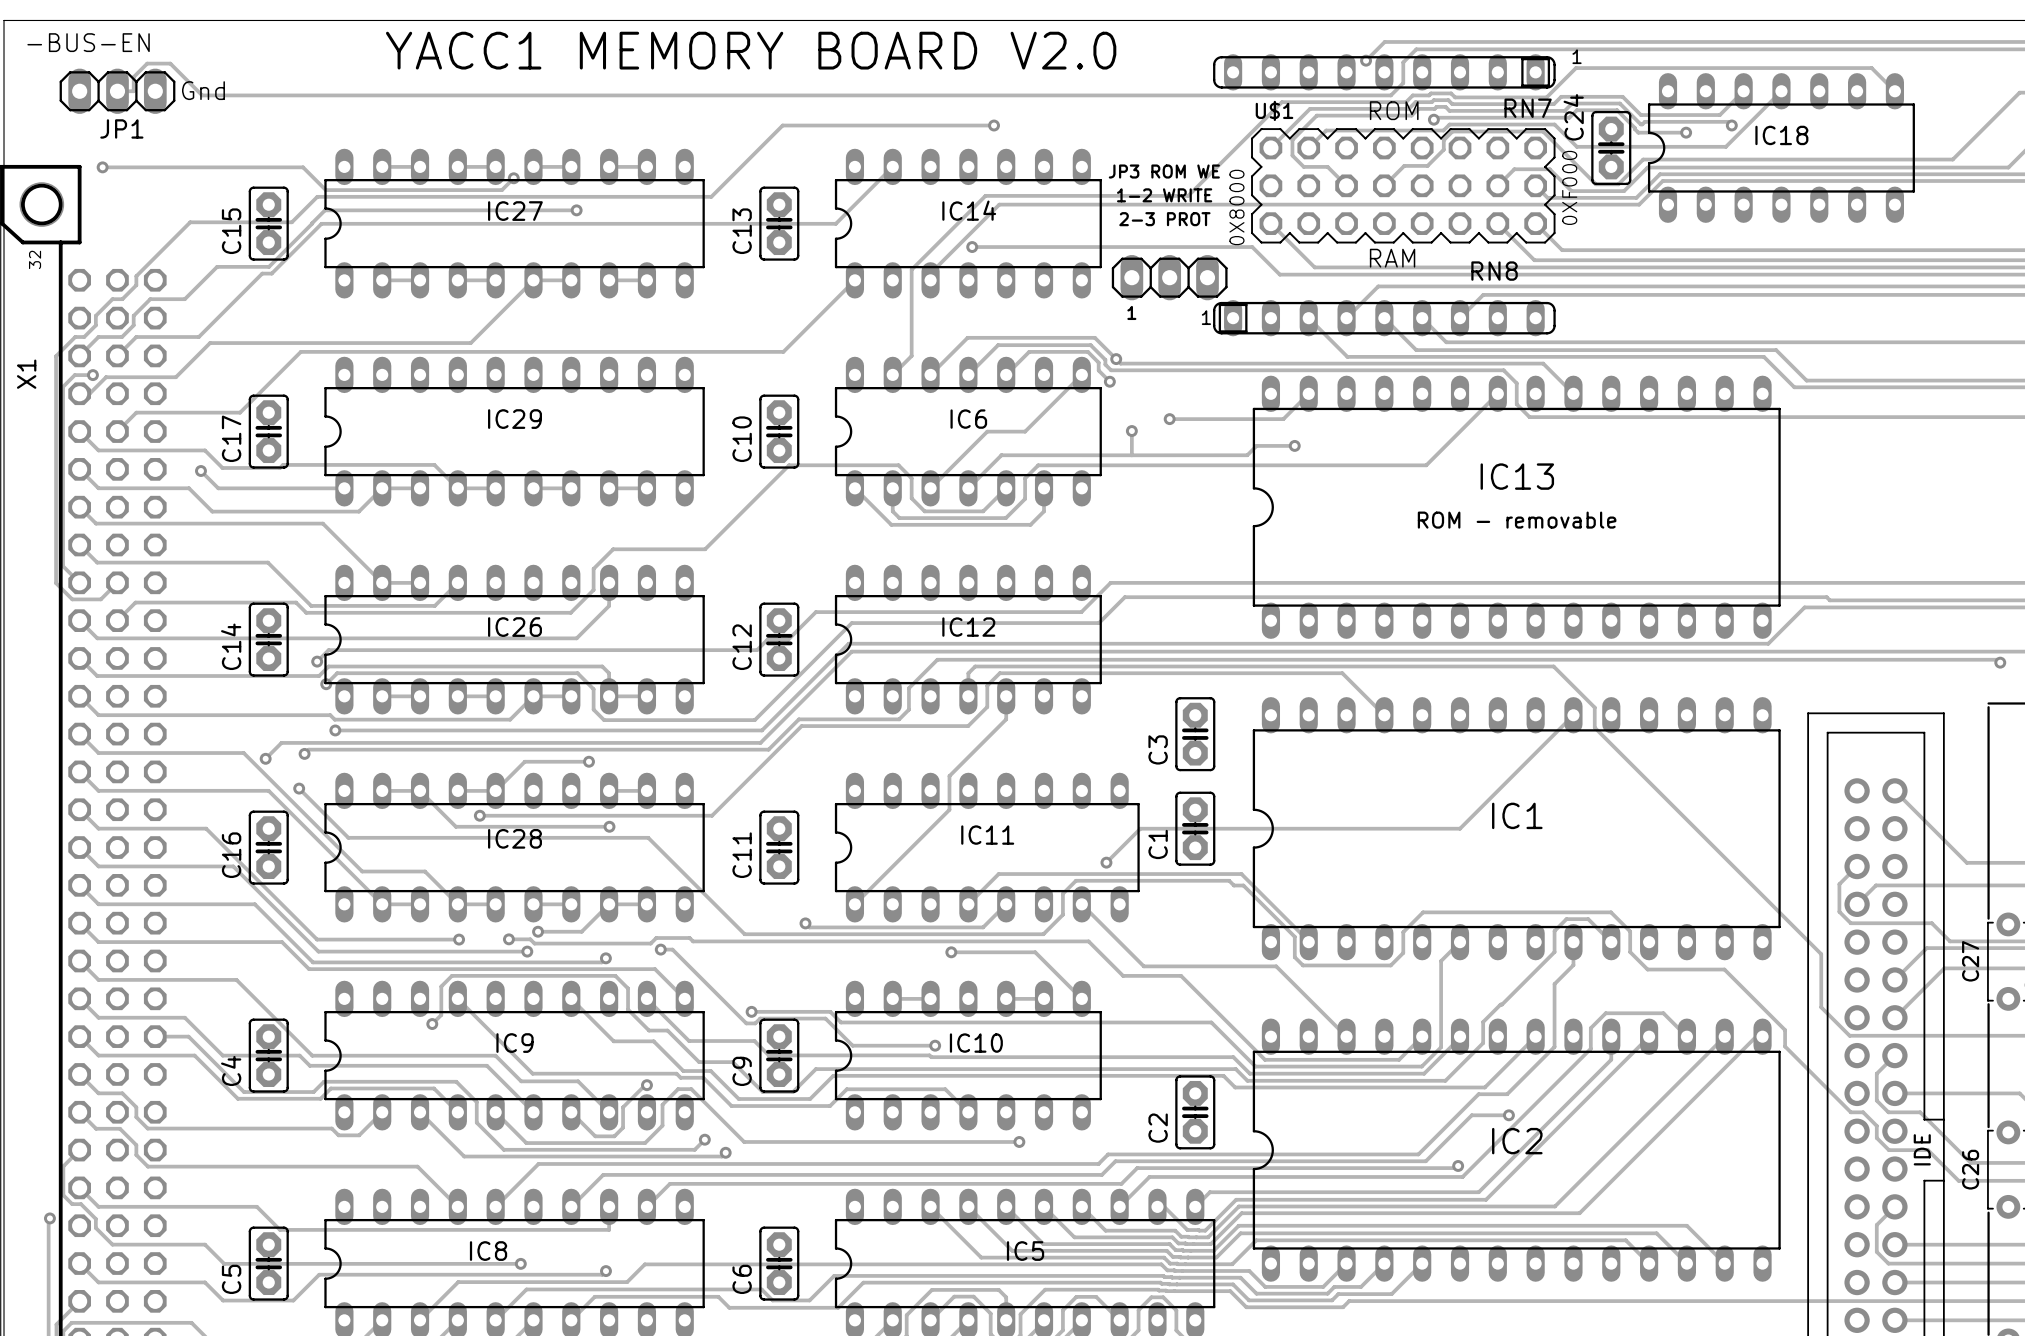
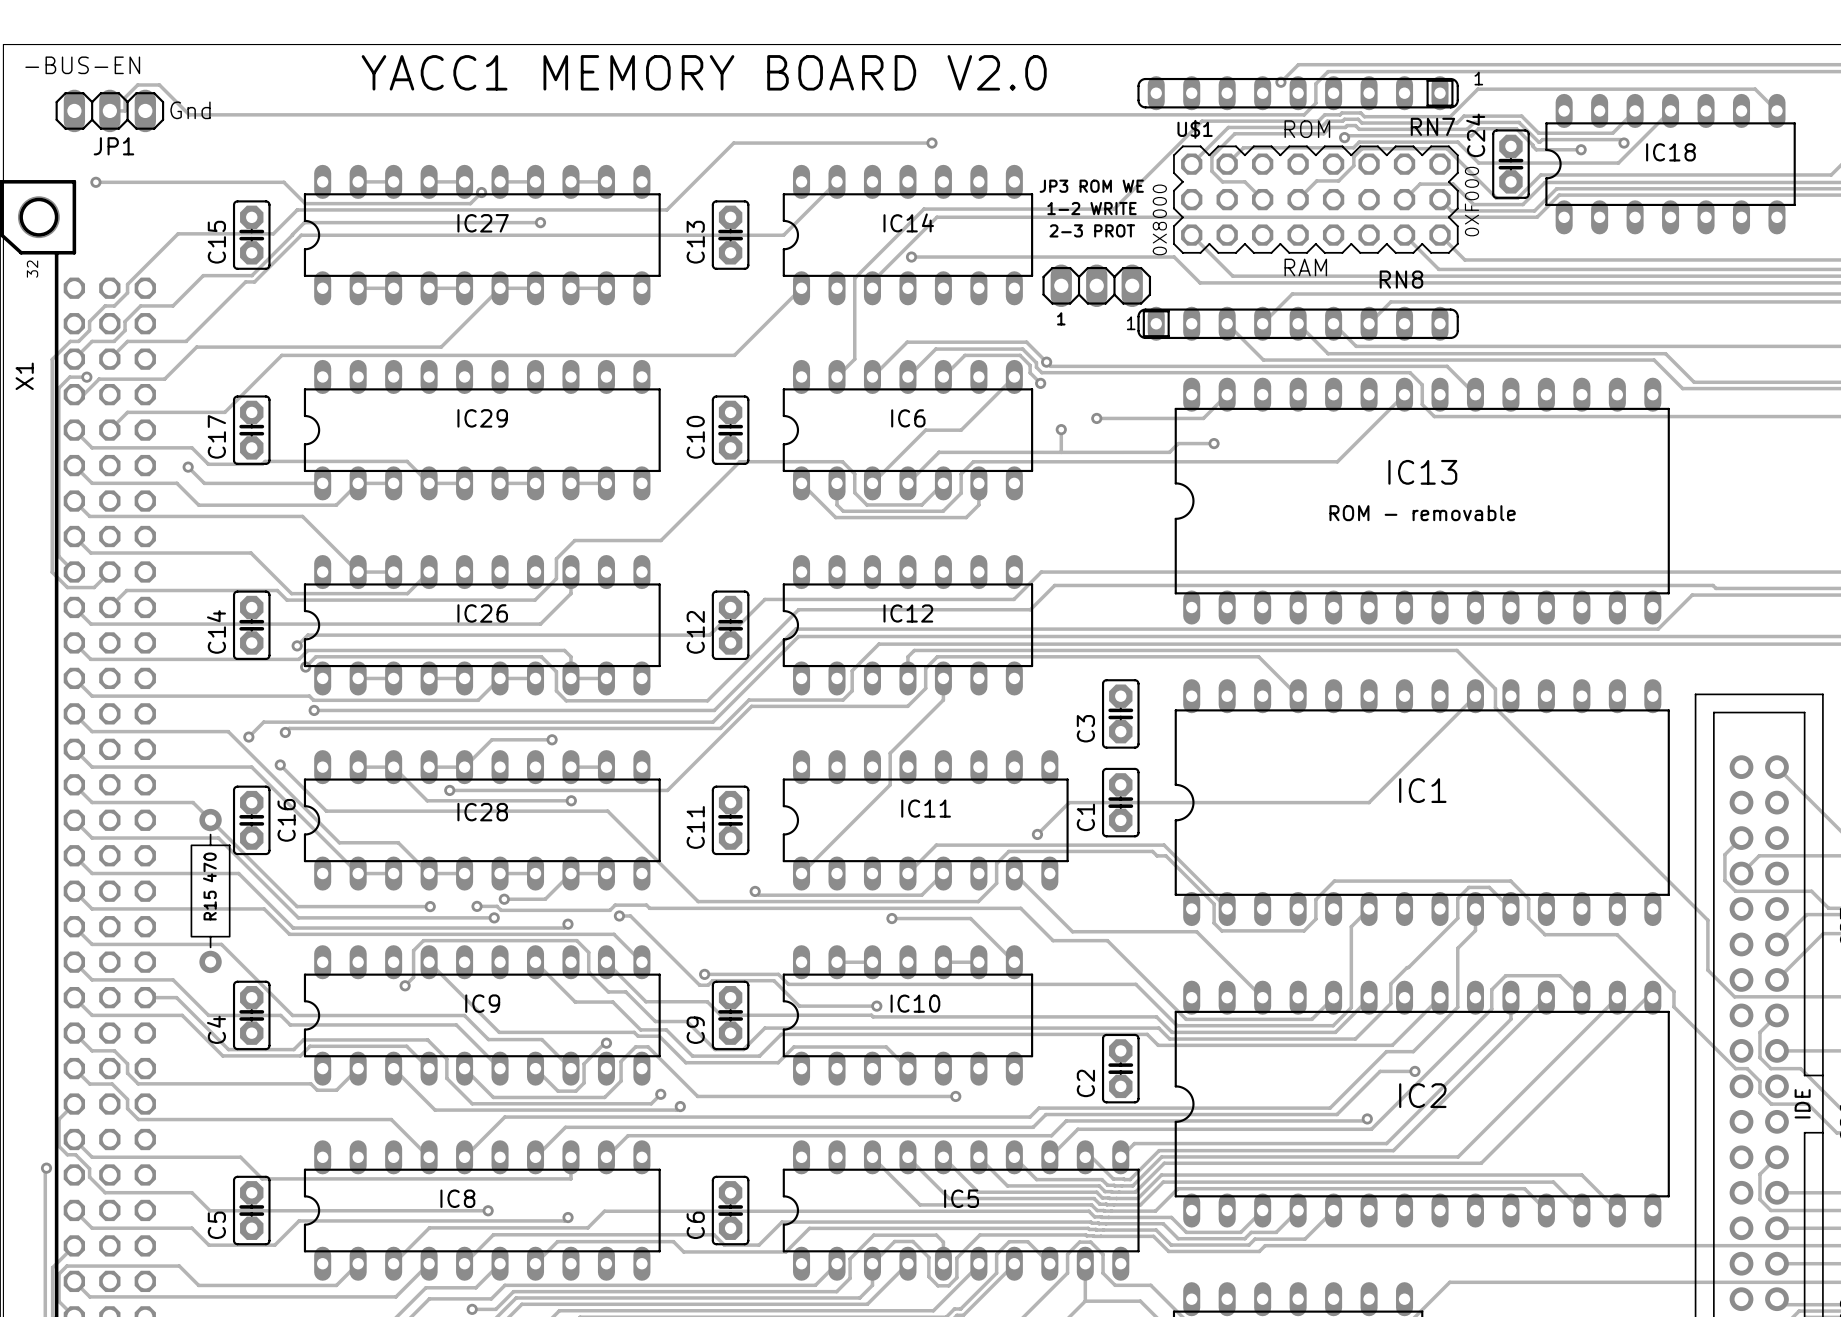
C16 name position: C16 (231, 855) -> C16 (286, 820)
text: none -> 470 (209, 867)
R15: none -> (210, 891)

